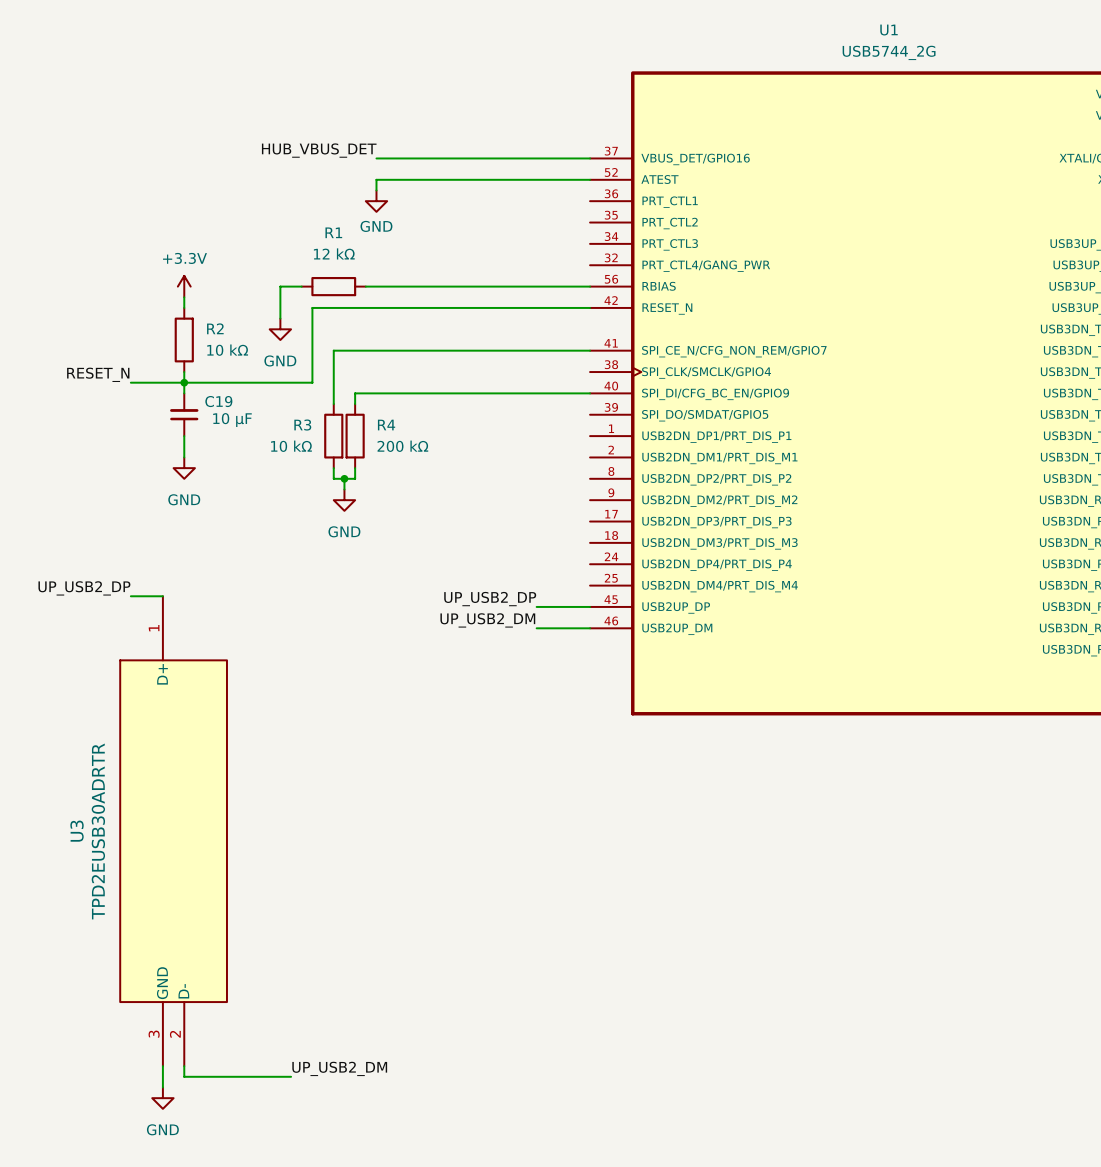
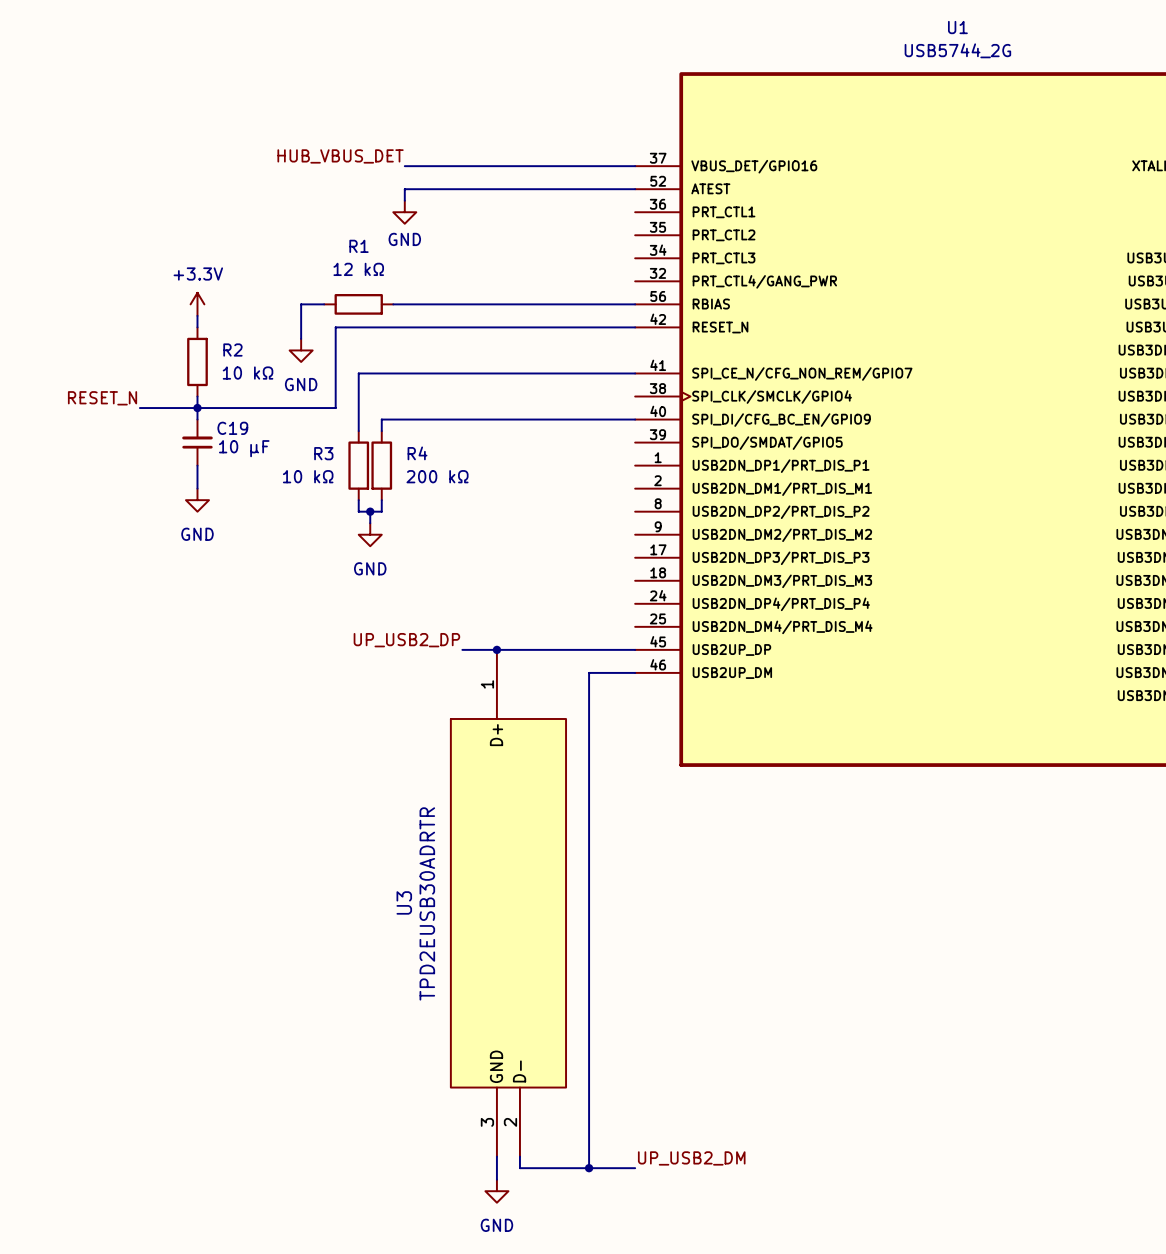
label: UP_USB2_DP (84, 588) -> none
wire: (130, 596) (162, 596) -> none
label position: UP_USB2_DP (490, 599) -> UP_USB2_DP (406, 640)
wire: none -> (462, 649) (577, 649)
junction: none -> (496, 649)
label: UP_USB2_DM (487, 620) -> none
wire: (536, 628) (547, 628) -> (589, 1168) (589, 672)
U3 position: (173, 831) -> (508, 903)
wire: (162, 1066) (162, 1087) -> none
wire: (184, 1066) (184, 1076) (291, 1076) -> none
label: UP_USB2_DM (339, 1068) -> none
wire: none -> (496, 1156) (496, 1179)
wire: none -> (519, 1156) (519, 1168) (635, 1168)
label: none -> UP_USB2_DM (691, 1158)
junction: none -> (589, 1168)
power symbol: GND (162, 1098) -> none
power symbol: none -> GND (496, 1191)

